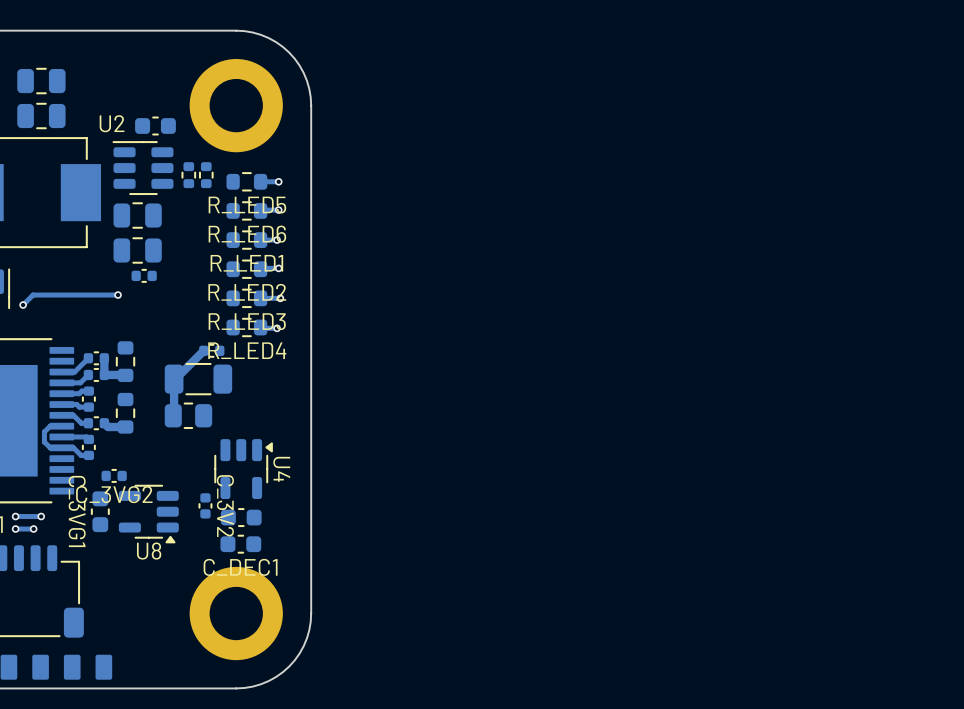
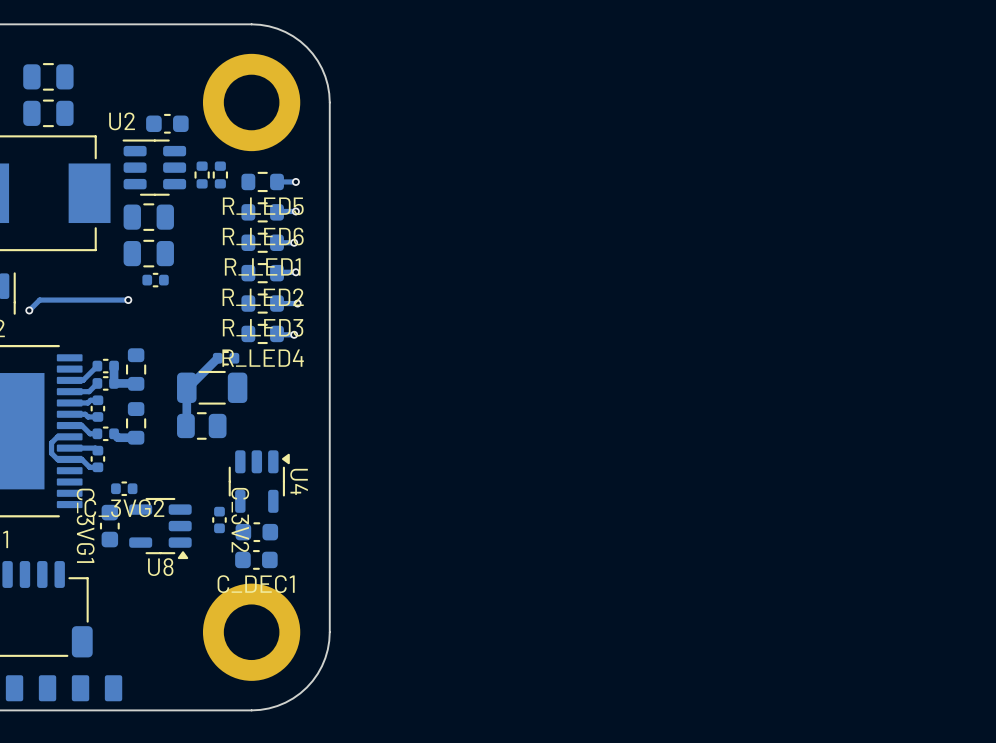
via: (15, 516) -> none
track: (41, 516) (15, 516) -> none
via: (41, 516) -> none
via: (15, 529) -> none
track: (33, 529) (15, 529) -> none
via: (33, 529) -> none

